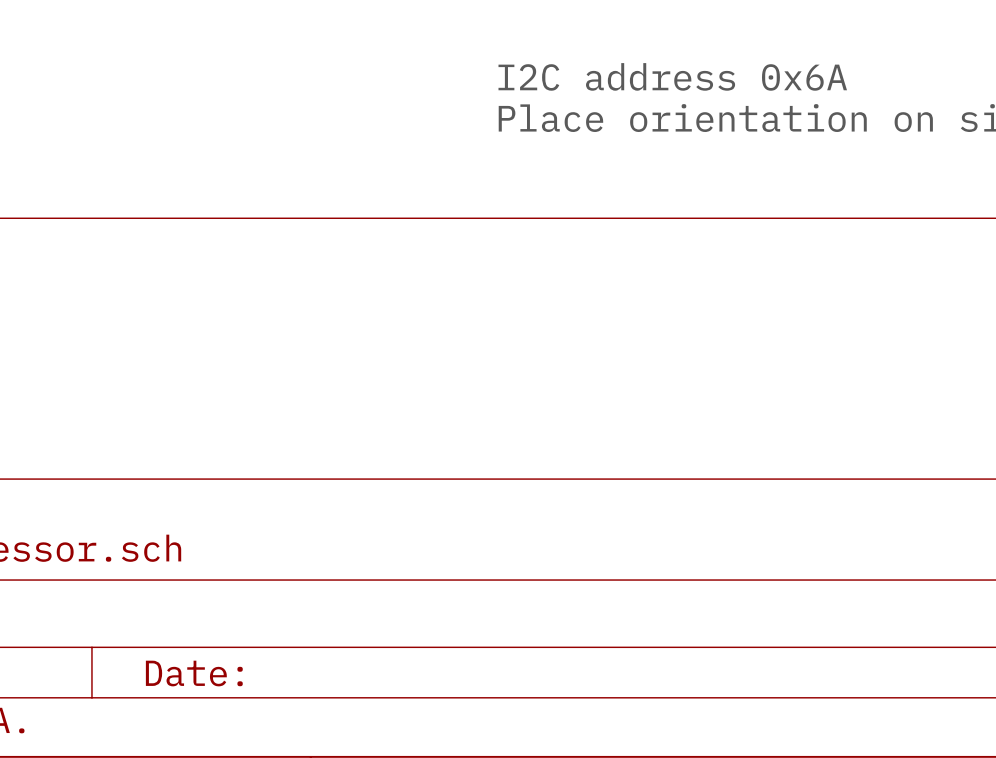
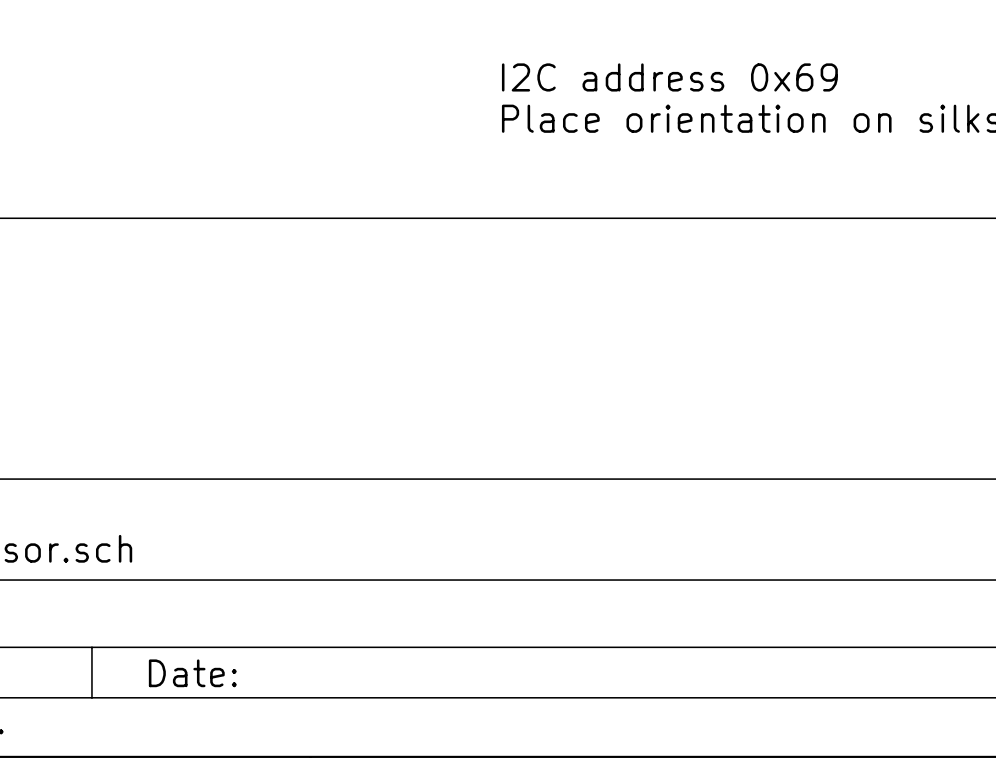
text: I2C address 0x6A (672, 76) -> I2C address 0x69 (669, 77)

